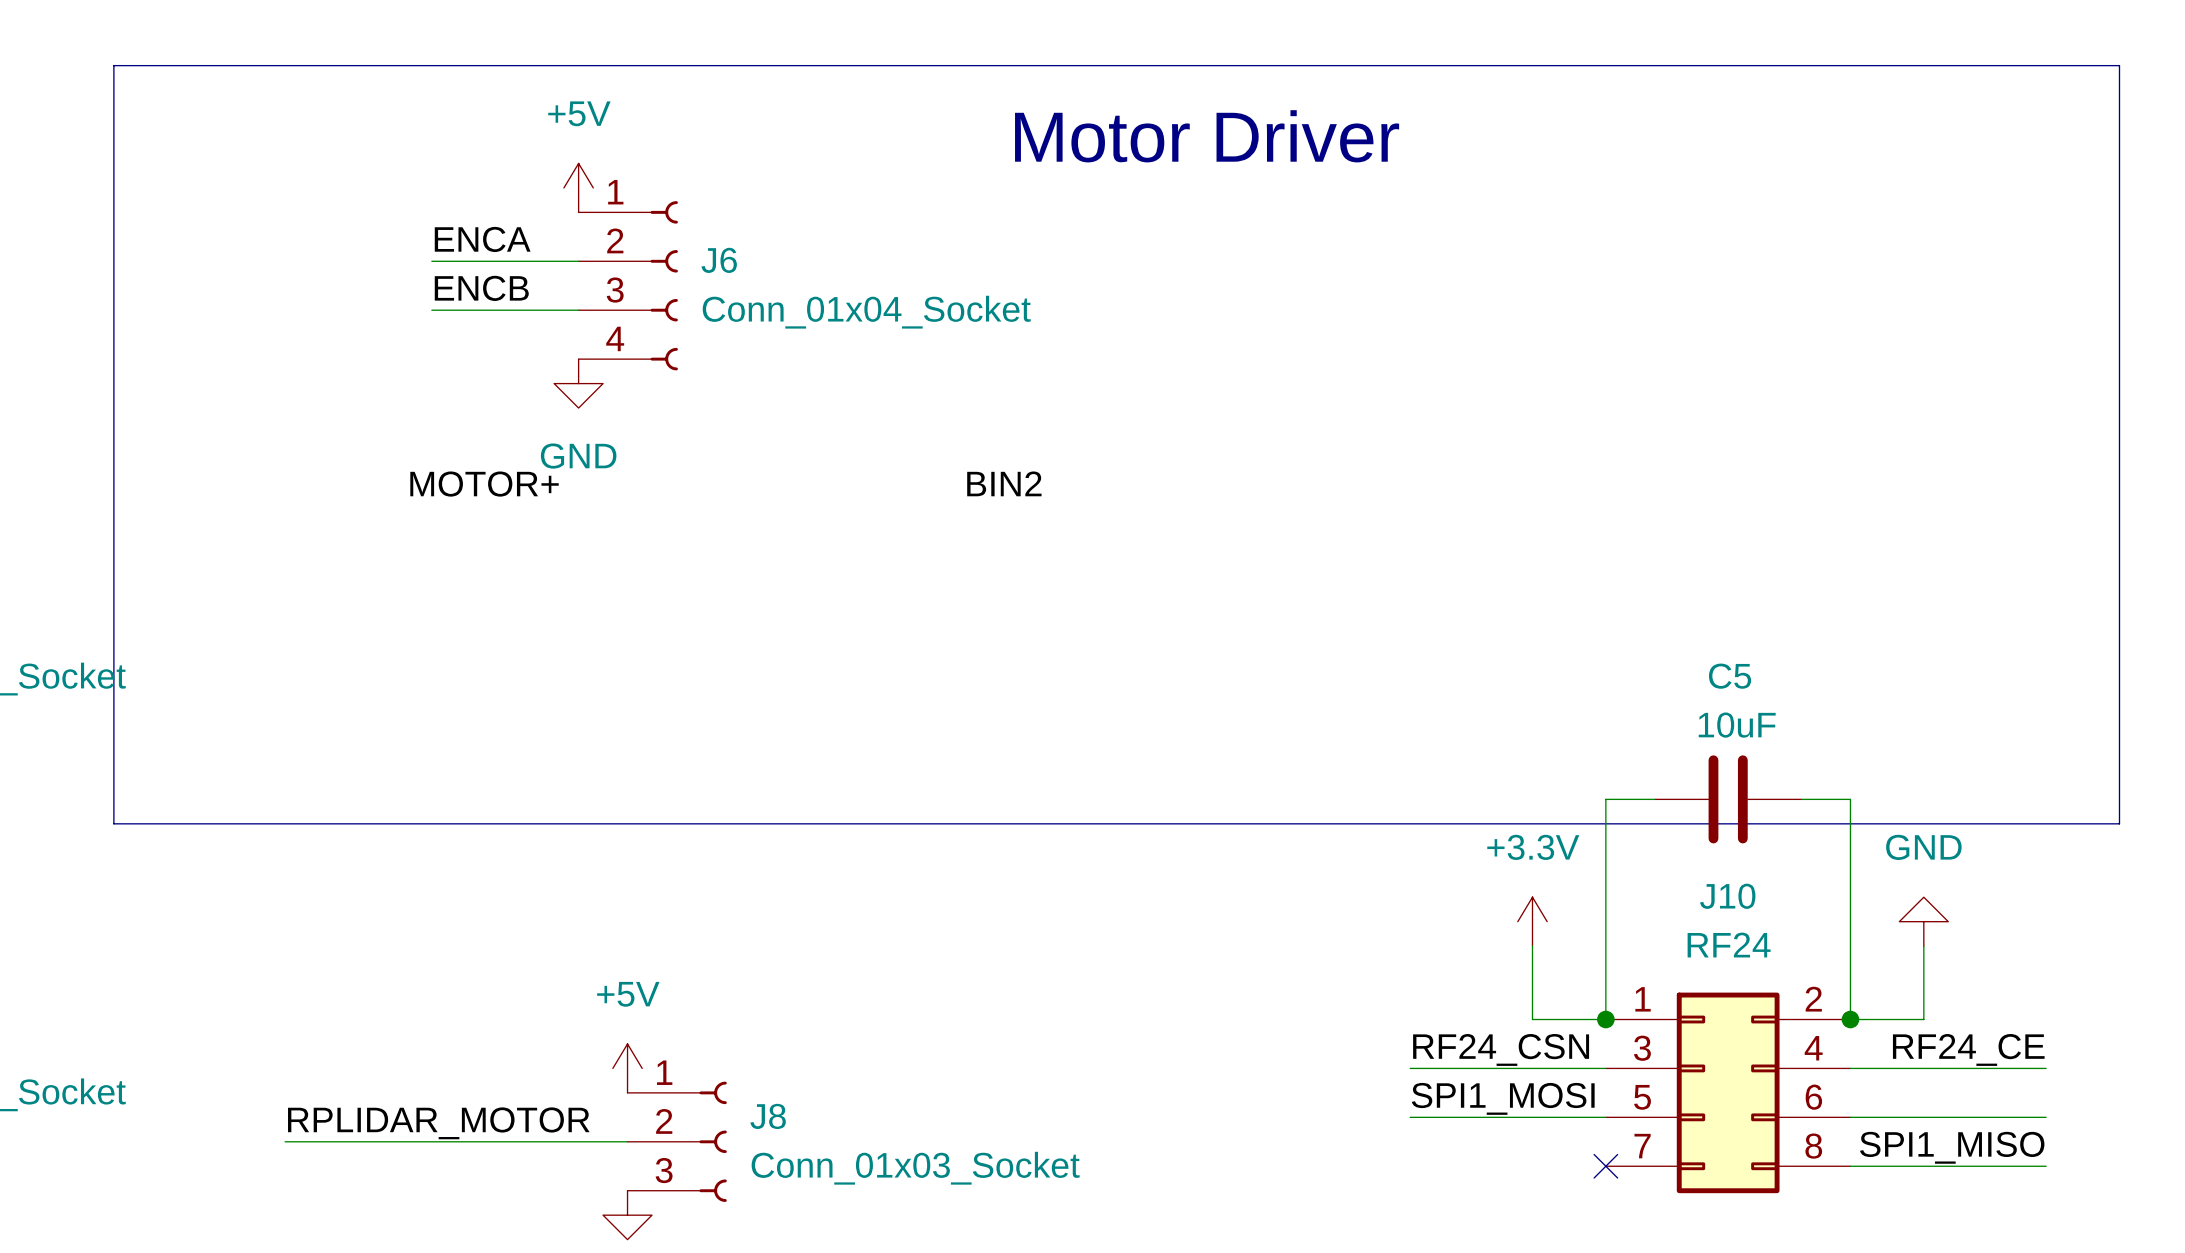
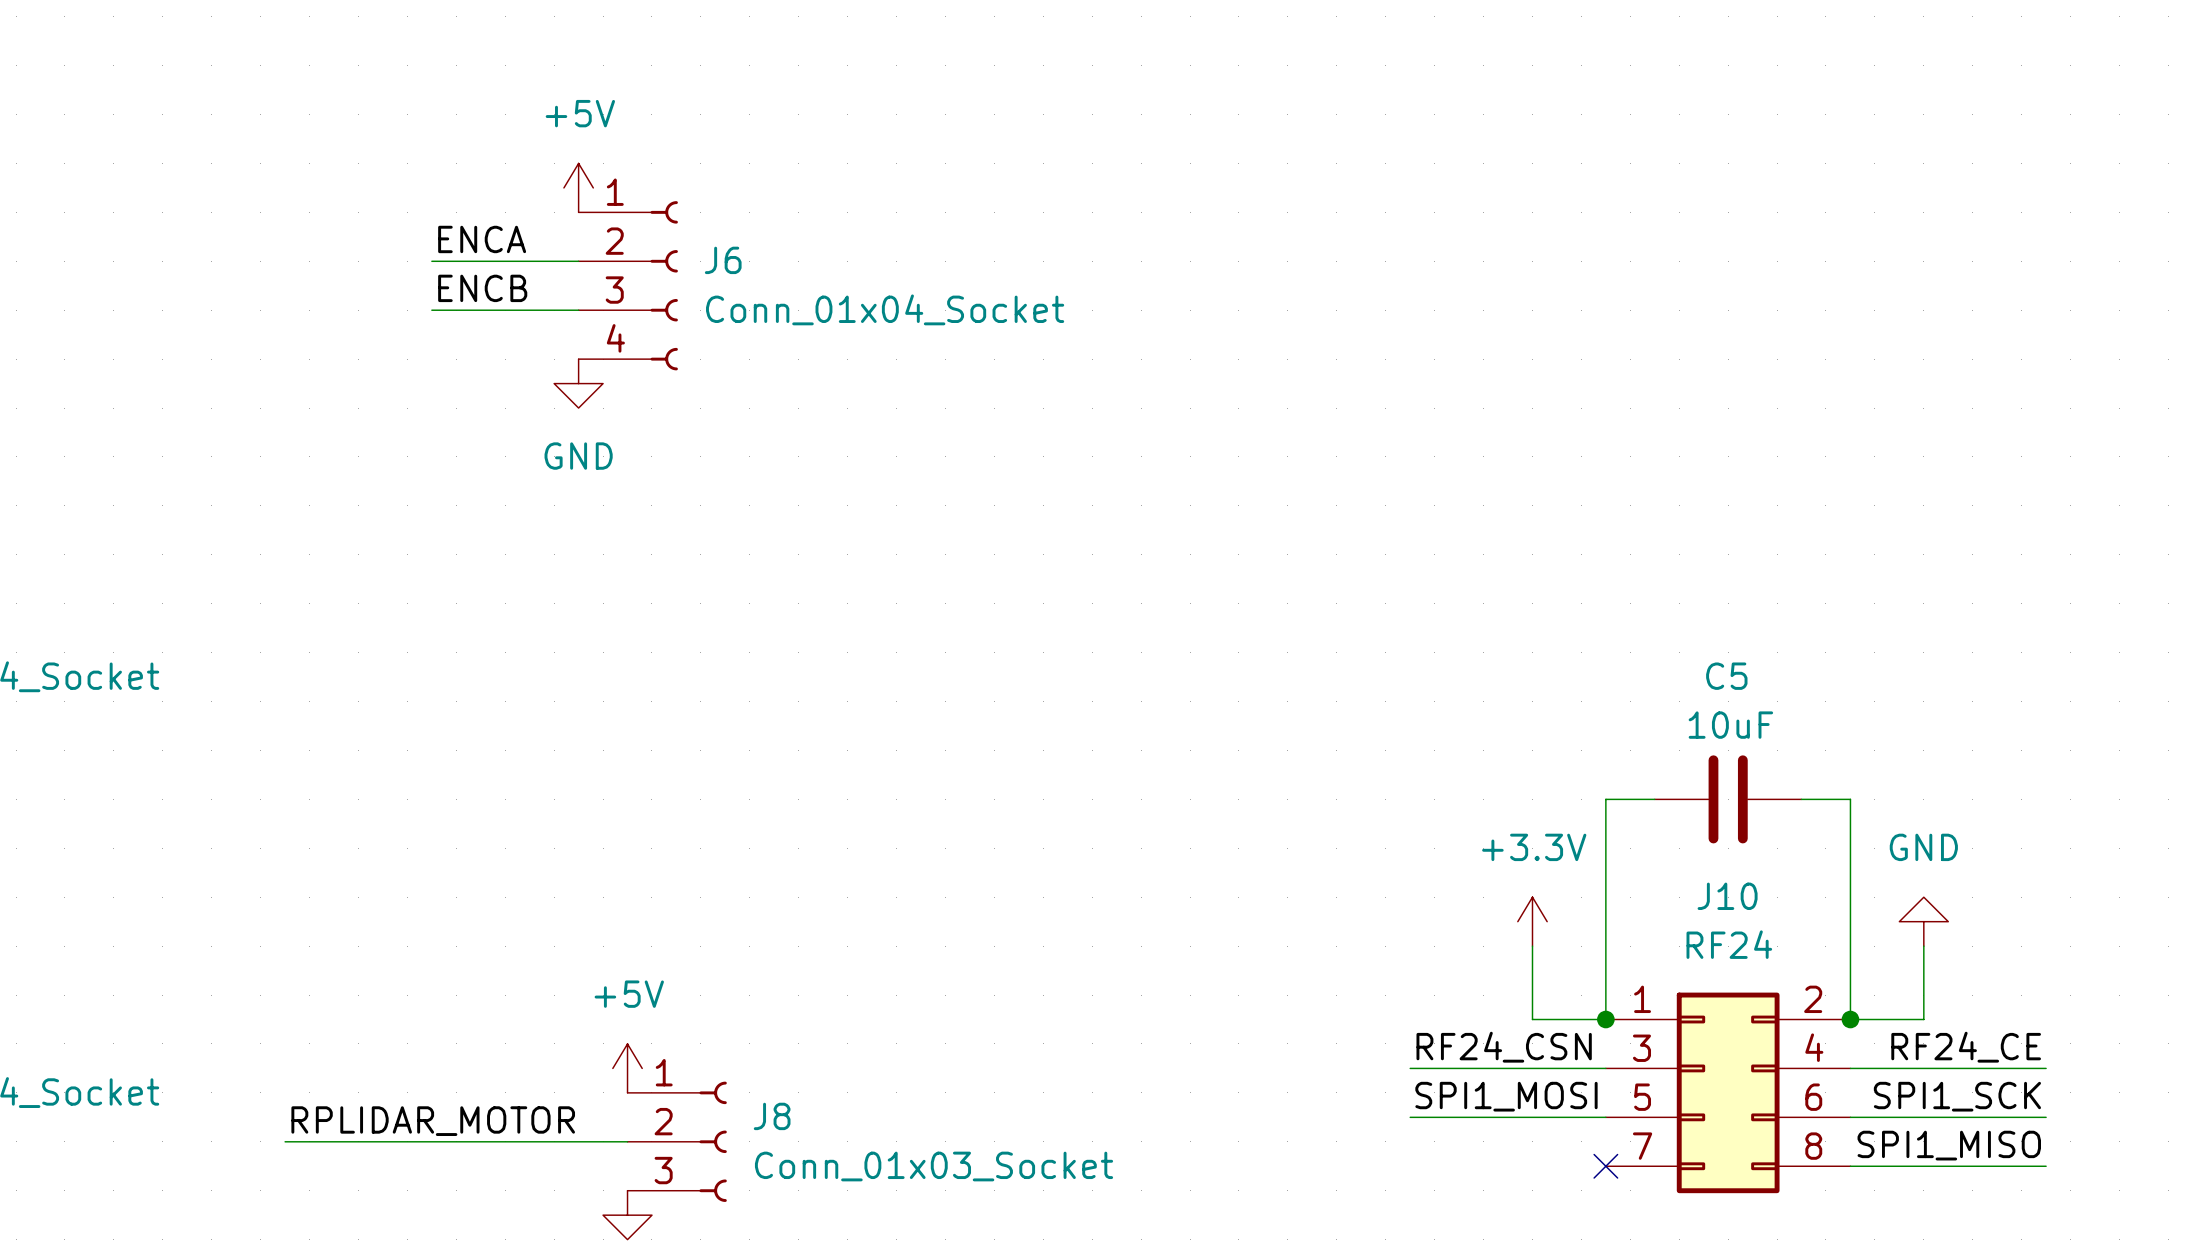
line: (113, 65) (2119, 65) (2119, 823) (113, 823) (113, 65) -> none
text: Motor Driver (1207, 136) -> none
label: BIN2 (1004, 483) -> none
label: MOTOR+ (484, 484) -> none
label: none -> SPI1_SCK (1957, 1096)

